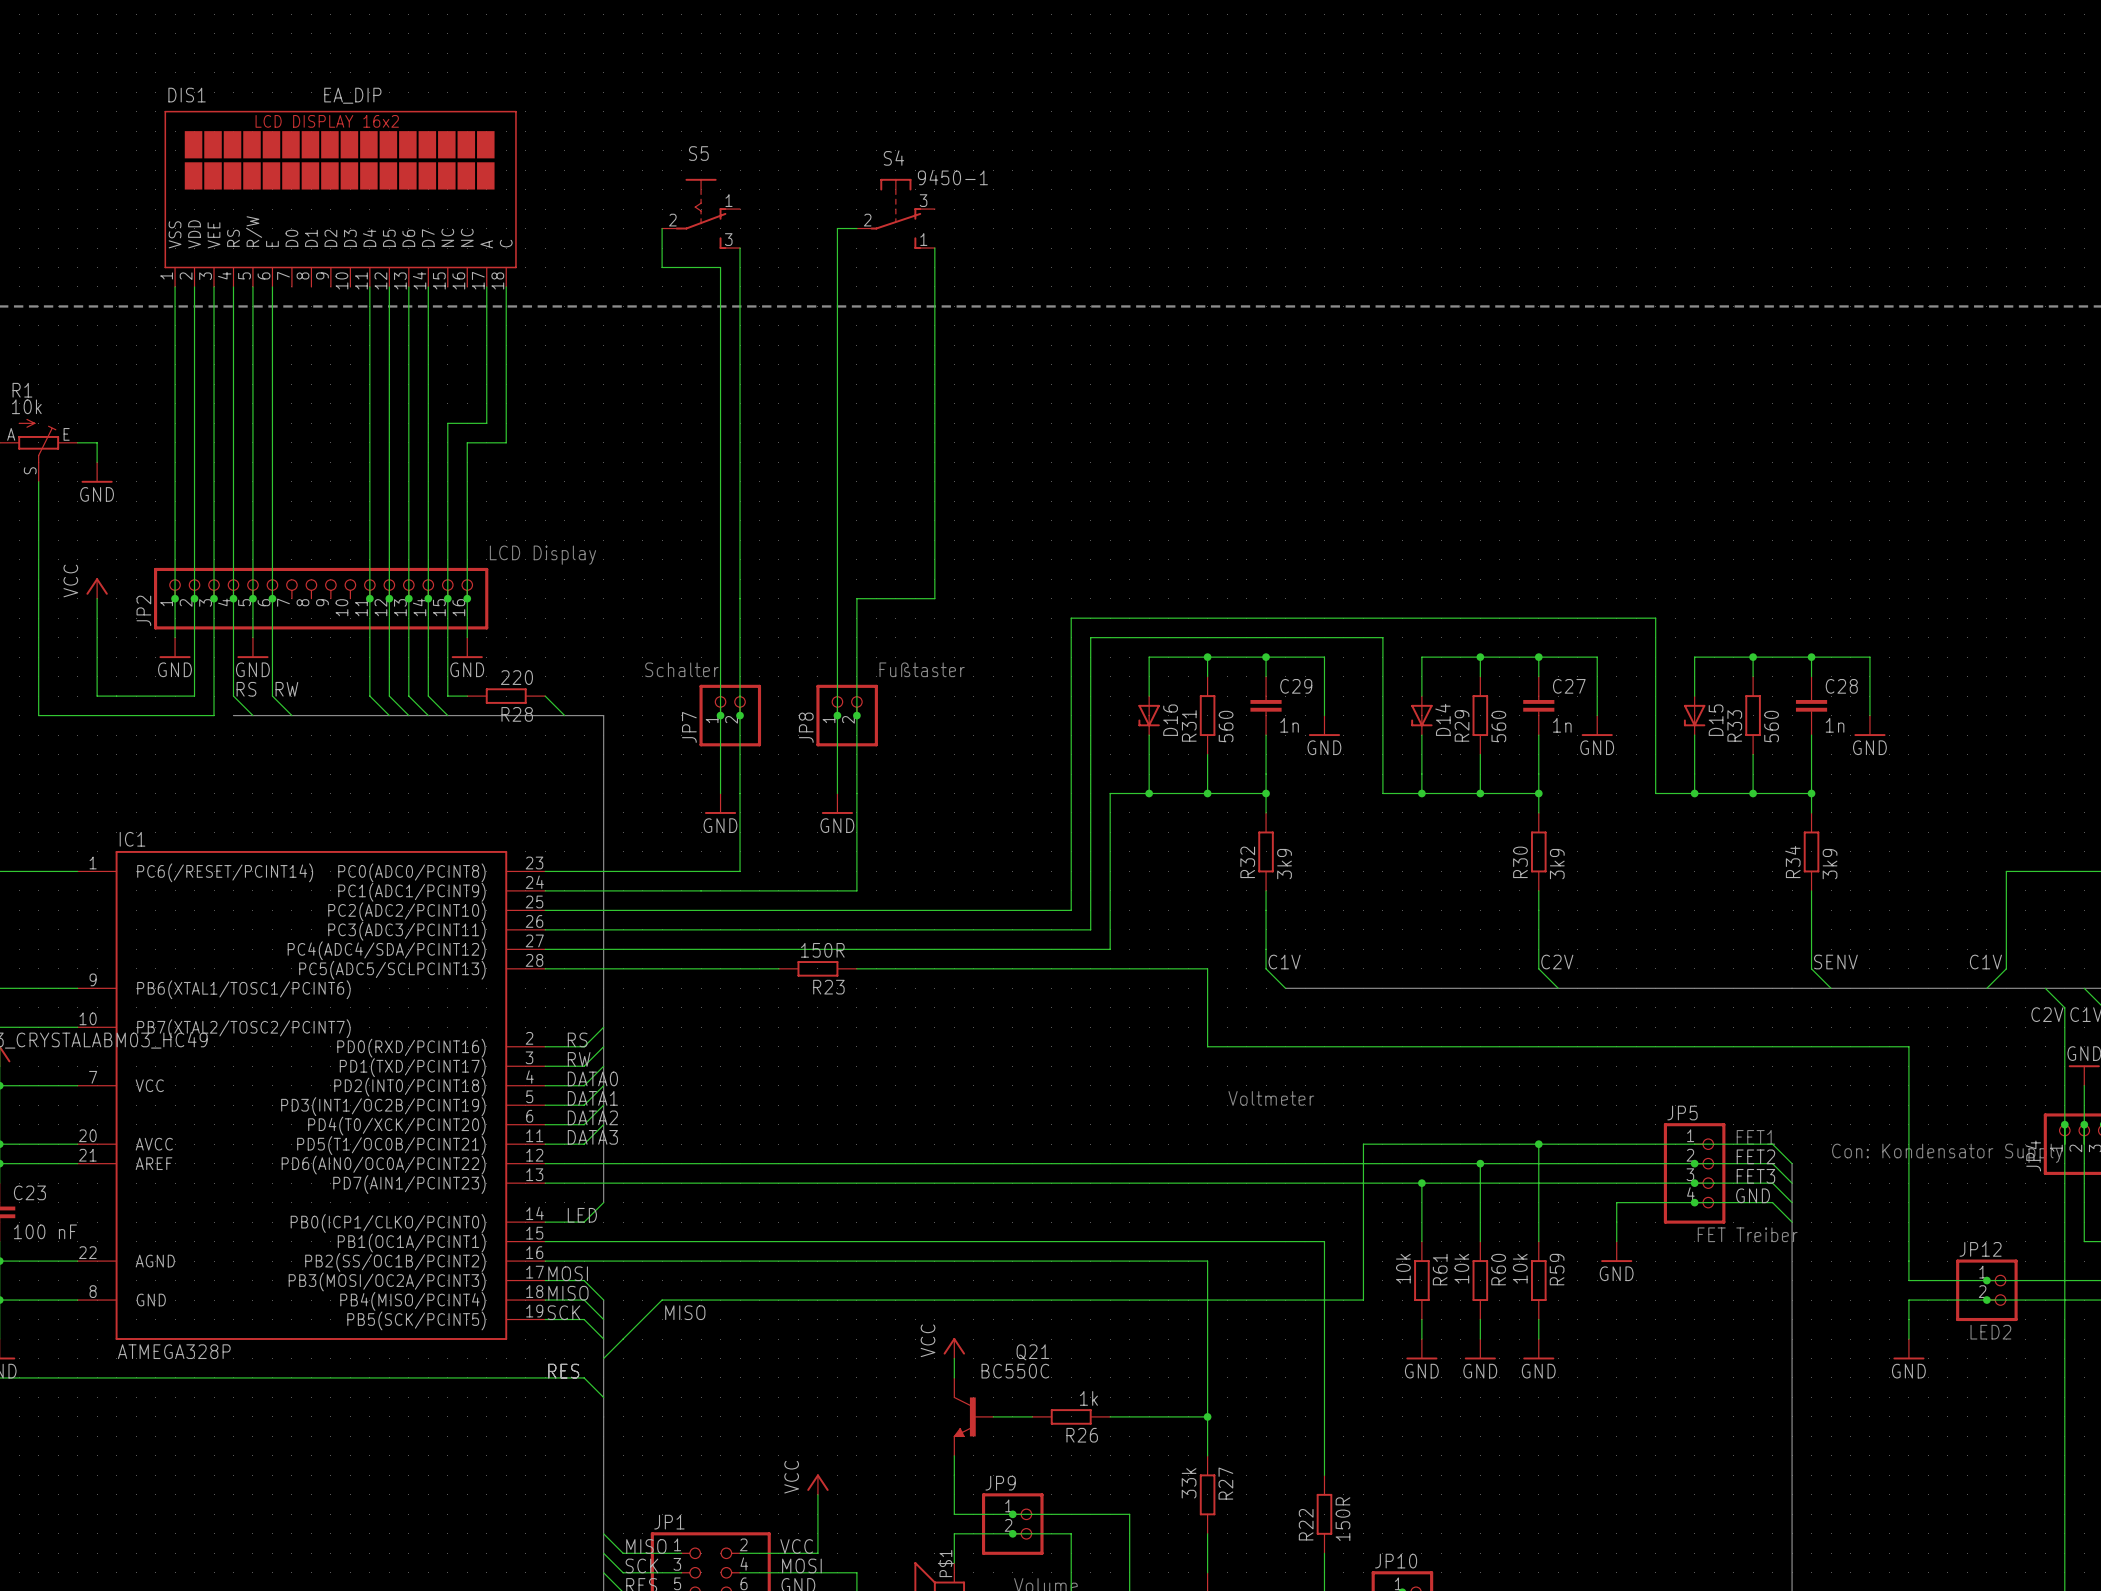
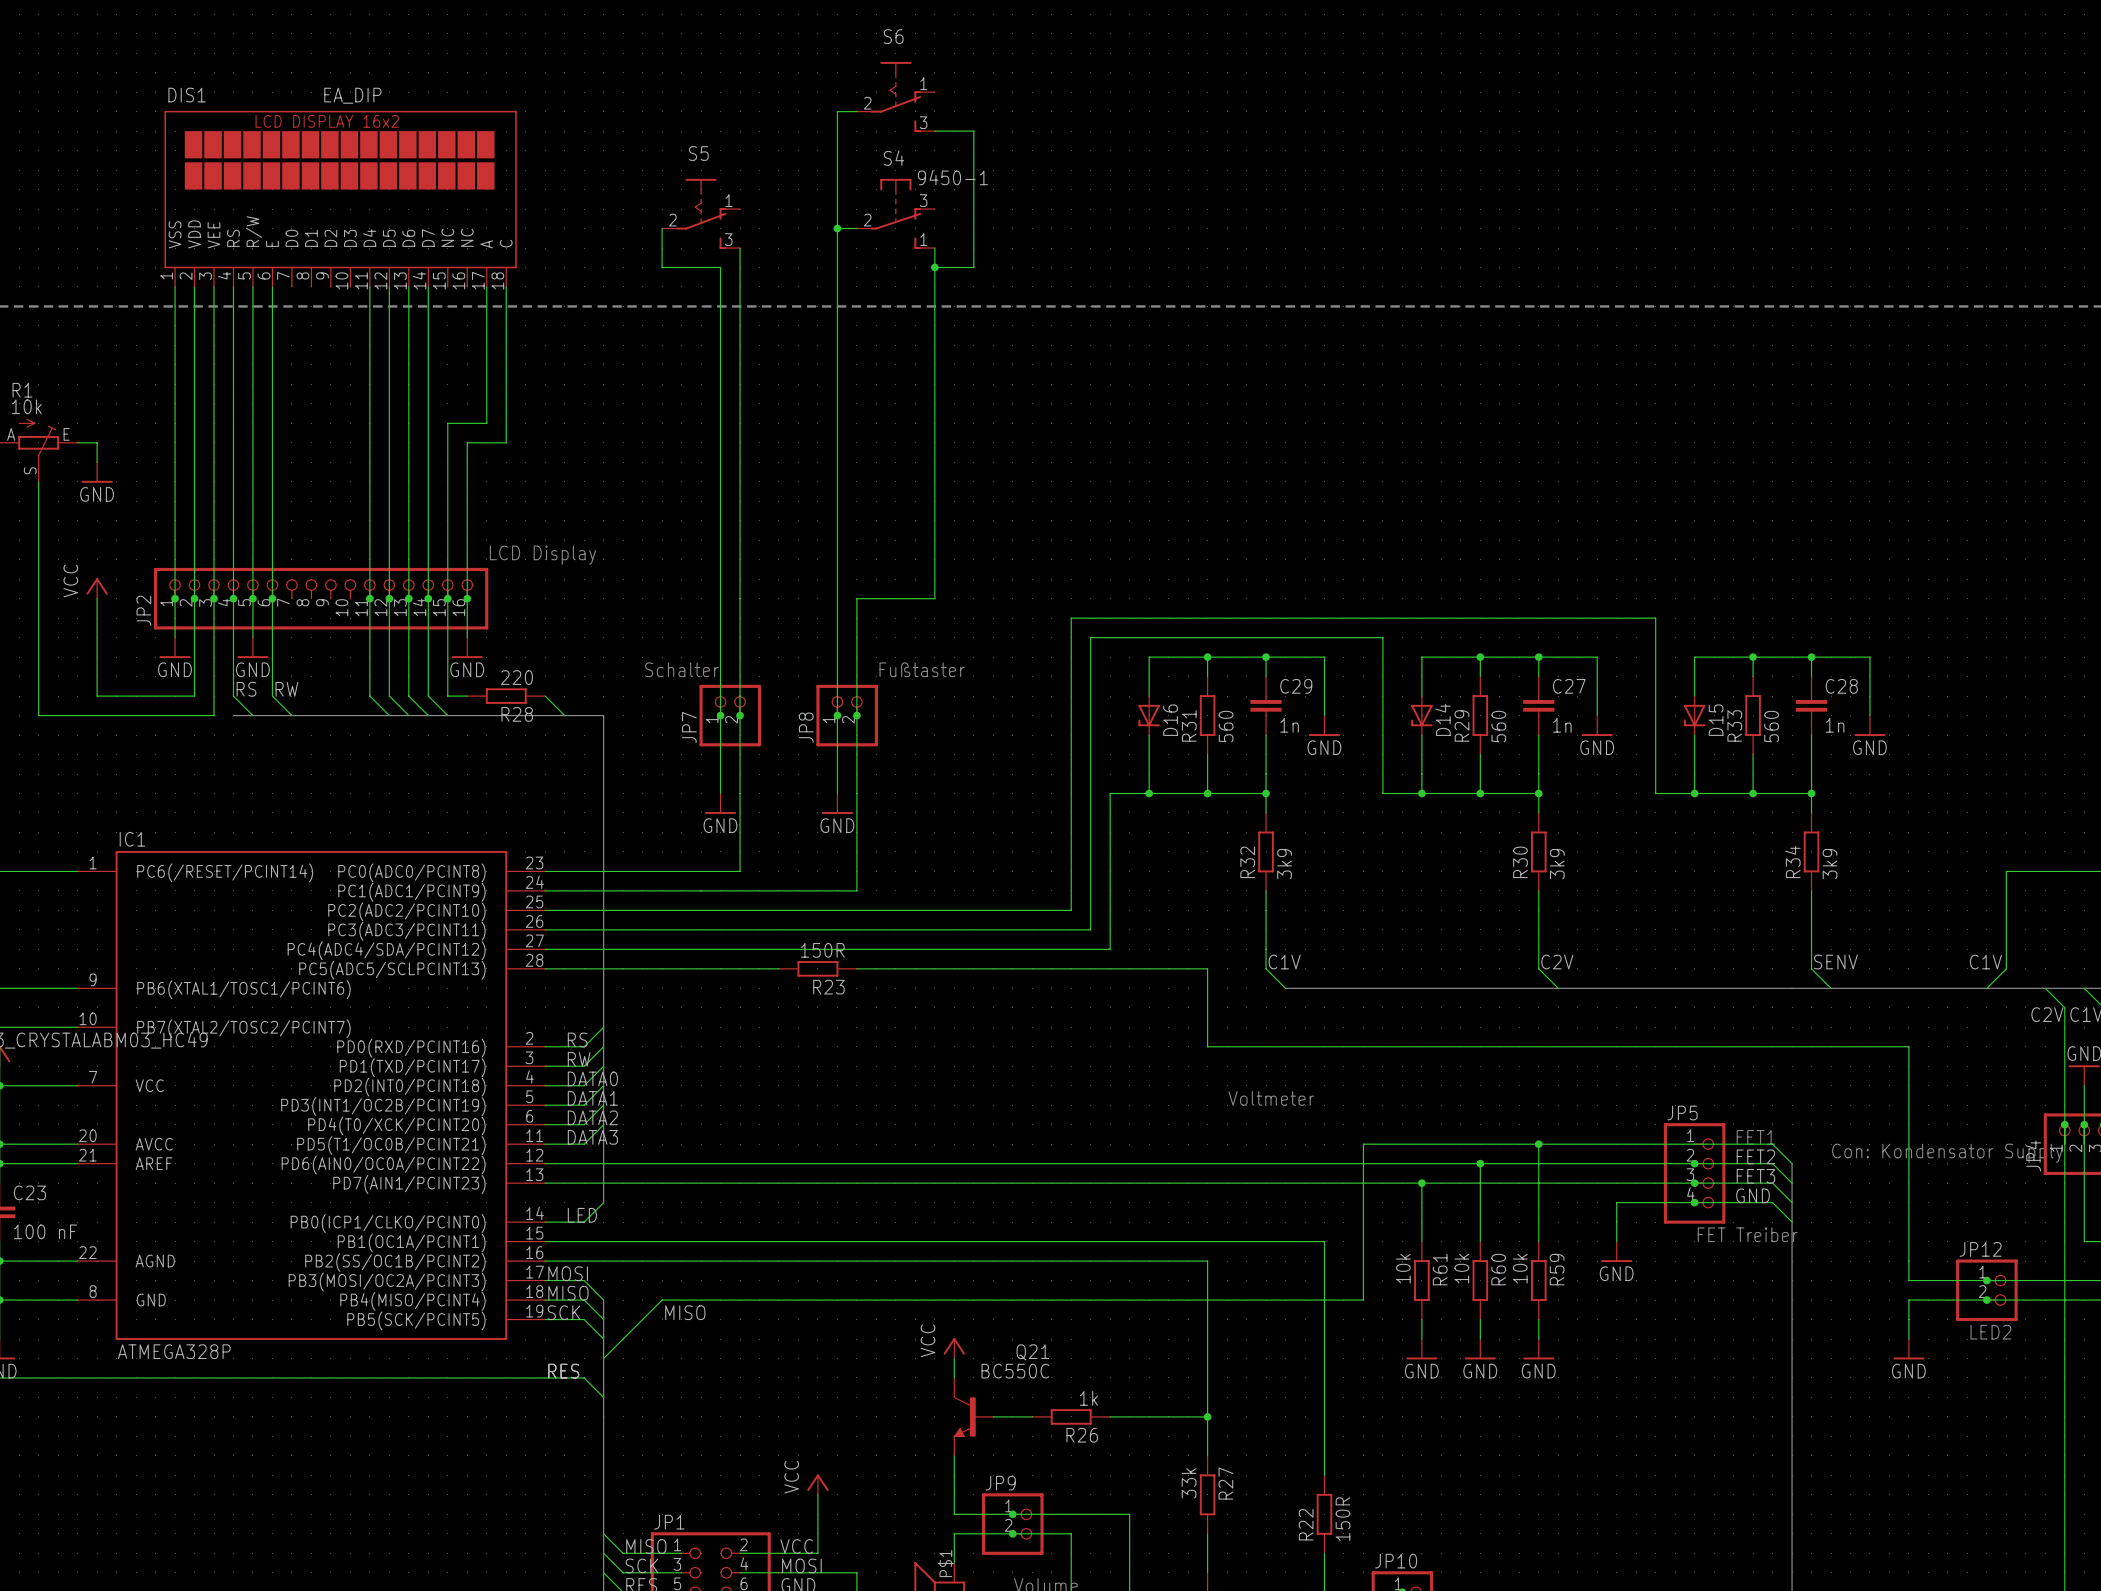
S6: none -> (895, 97)
wire: none -> (856, 111) (837, 111) (837, 228)
wire: none -> (934, 131) (973, 131) (973, 267) (934, 267)
junction: none -> (837, 228)
junction: none -> (934, 267)

